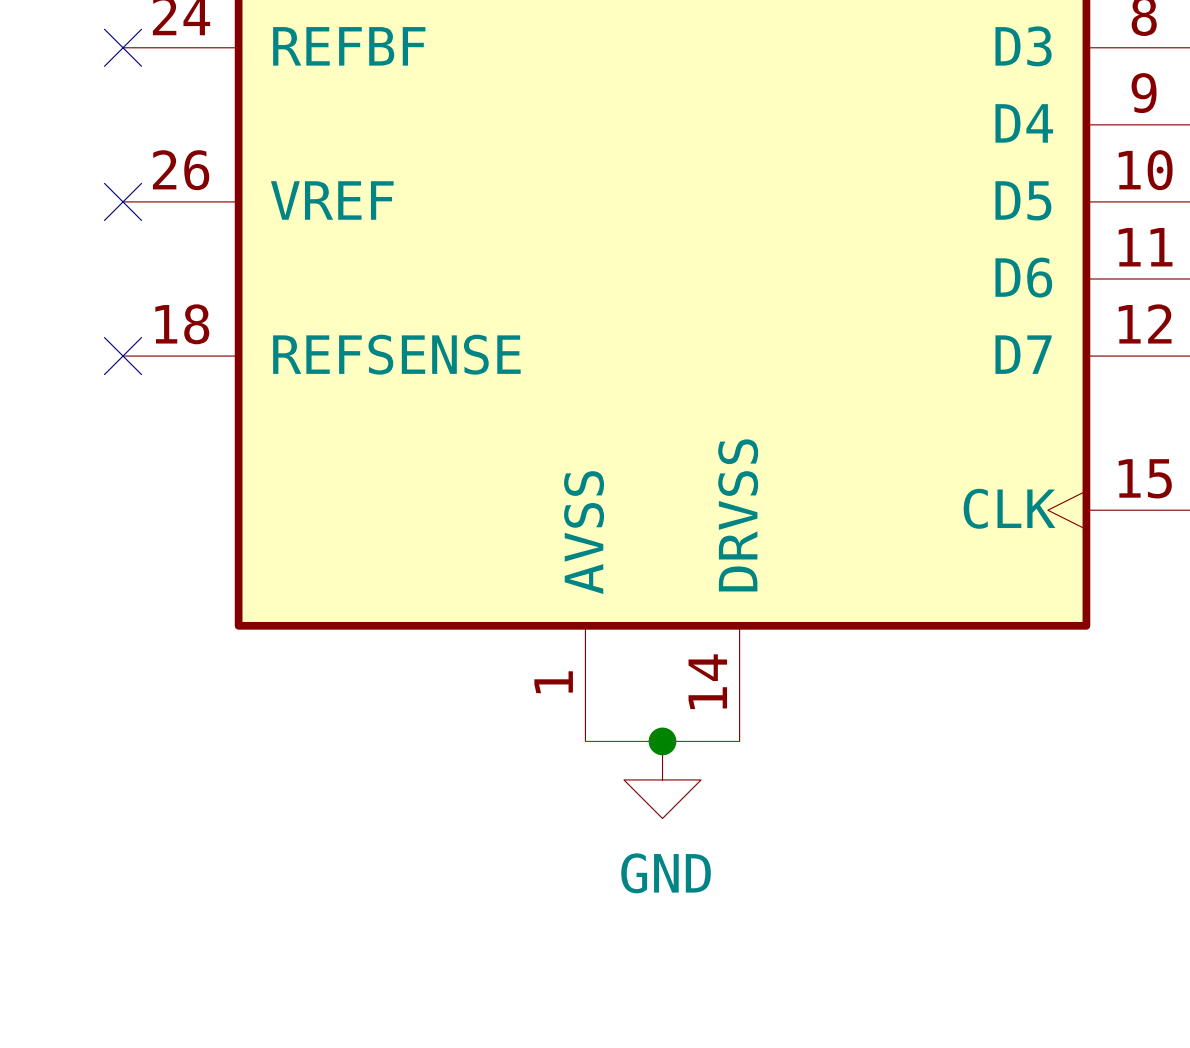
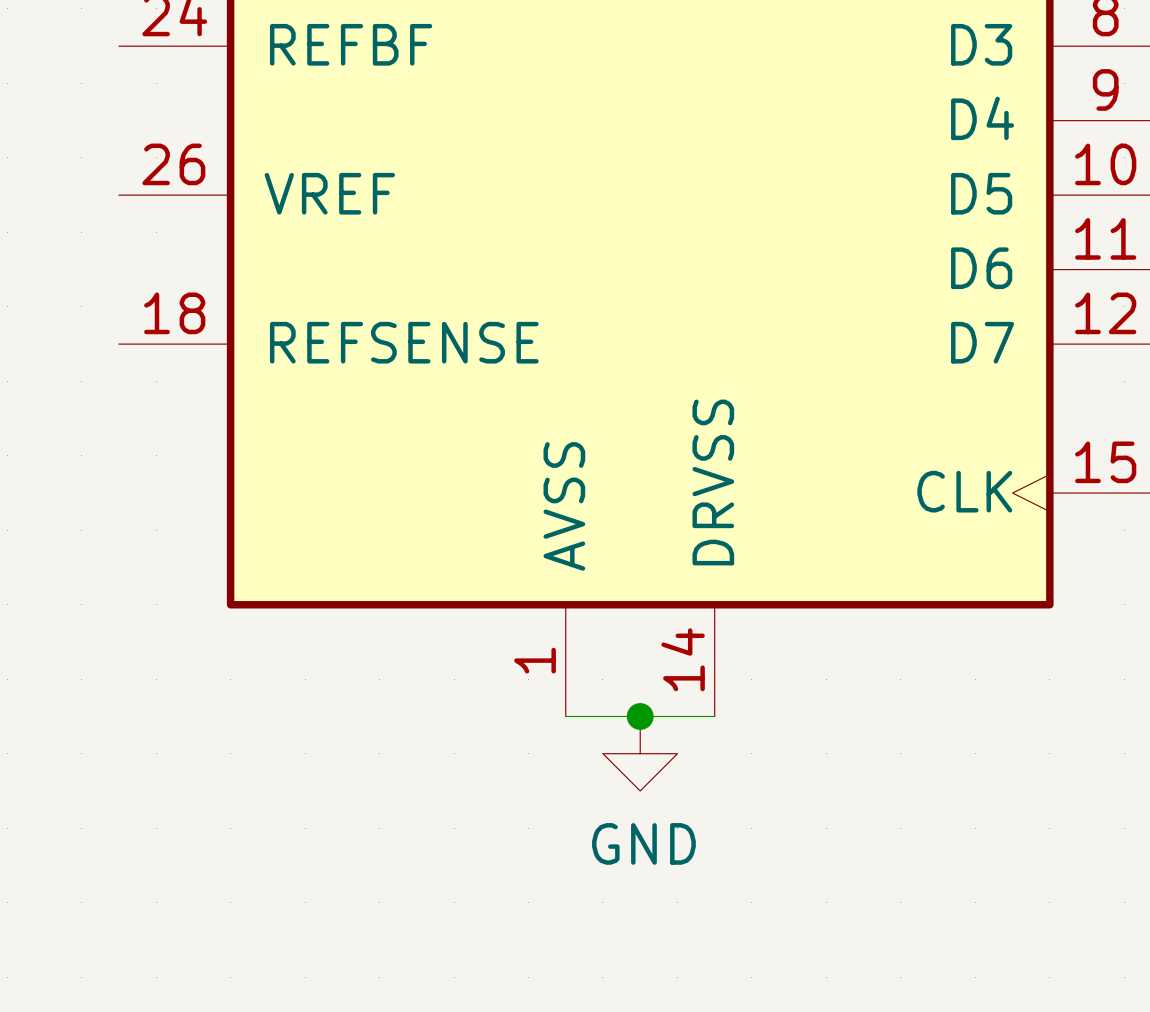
no-connect mark: (123, 47) -> none
no-connect mark: (123, 201) -> none
no-connect mark: (123, 356) -> none

